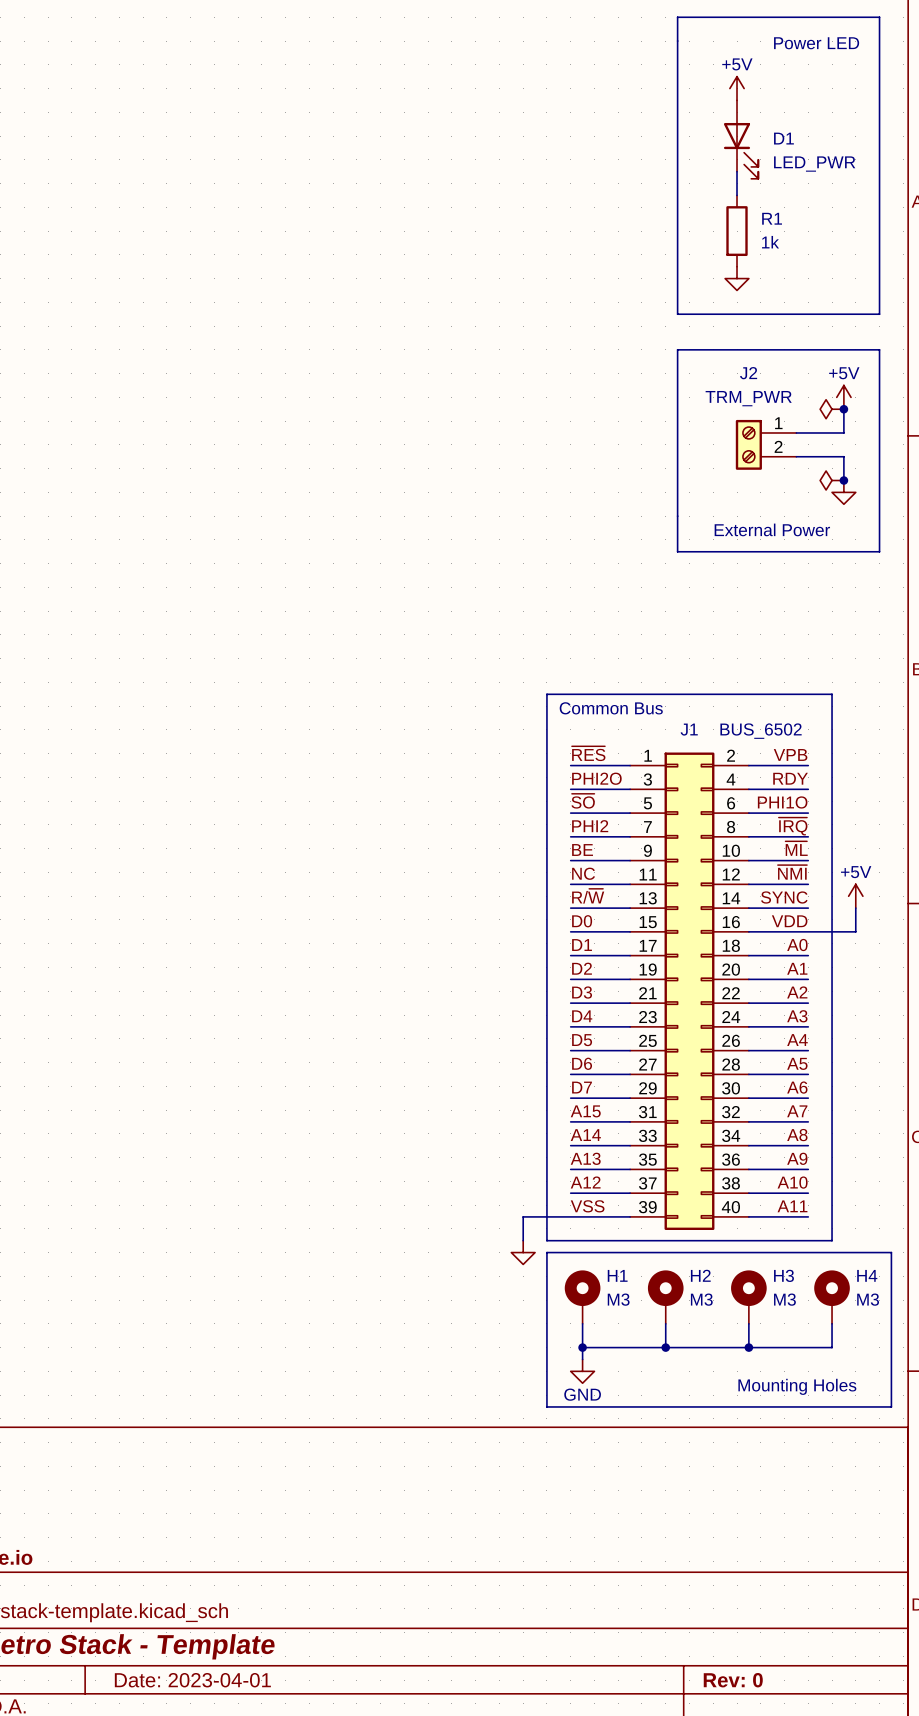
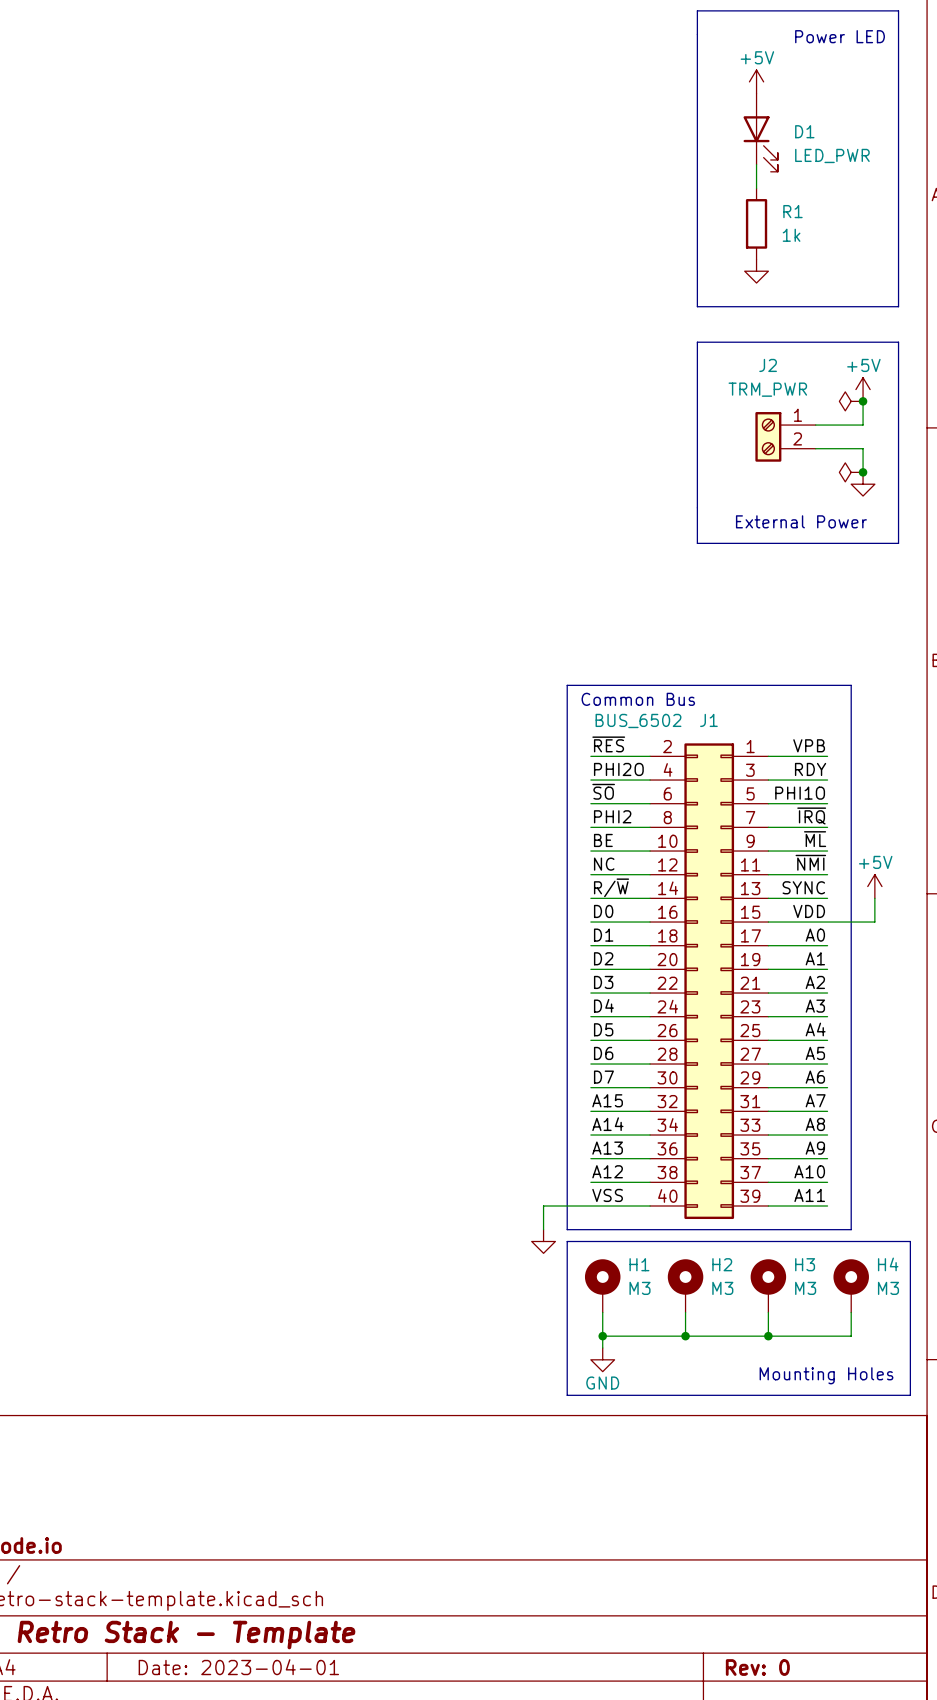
J1 flip: as is (689, 991) -> left-right (709, 981)

